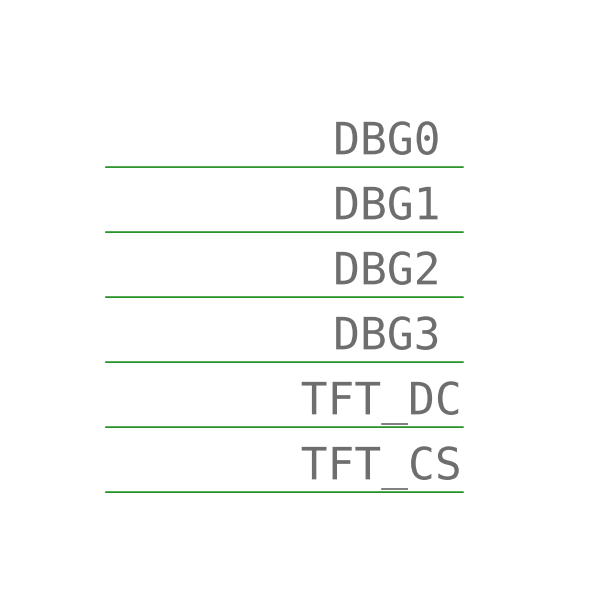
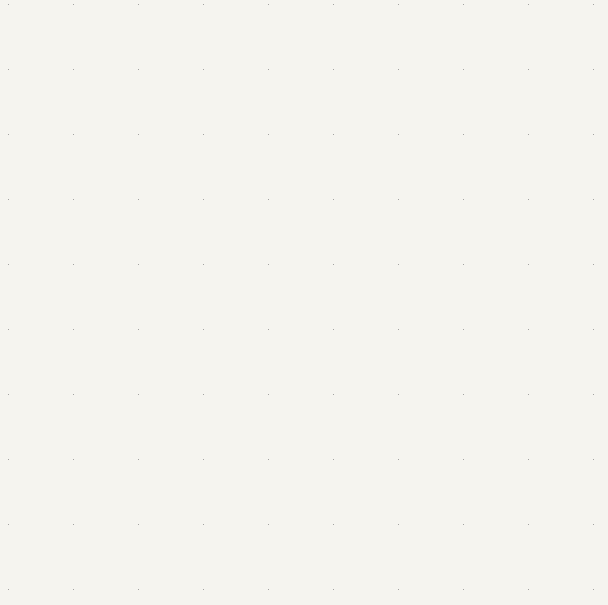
label: DBG0 (386, 138) -> none
wire: (105, 167) (463, 167) -> none
label: DBG1 (386, 203) -> none
wire: (105, 232) (463, 232) -> none
label: DBG2 (386, 268) -> none
wire: (105, 297) (463, 297) -> none
label: DBG3 (386, 333) -> none
wire: (105, 362) (463, 362) -> none
label: TFT_DC (379, 403) -> none
wire: (105, 427) (463, 427) -> none
label: TFT_CS (380, 468) -> none
wire: (105, 492) (463, 492) -> none

